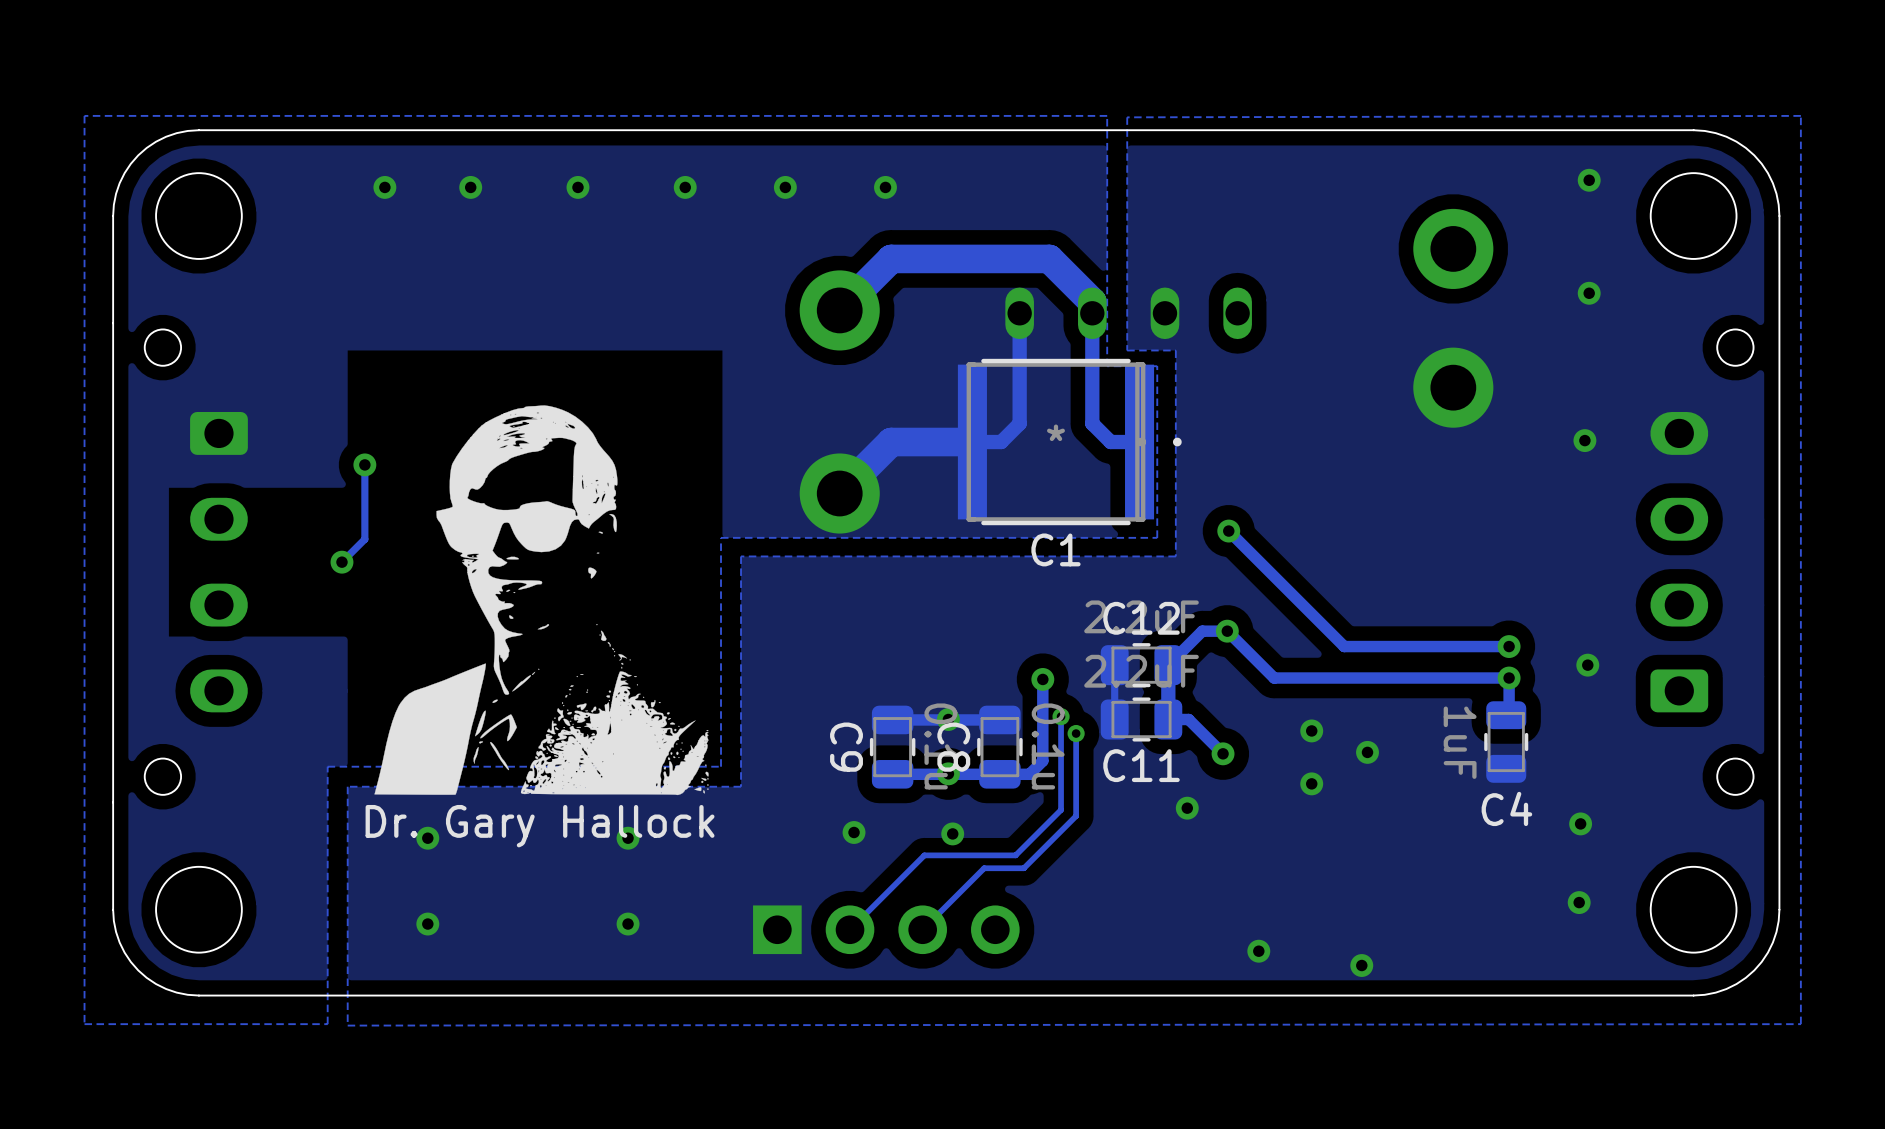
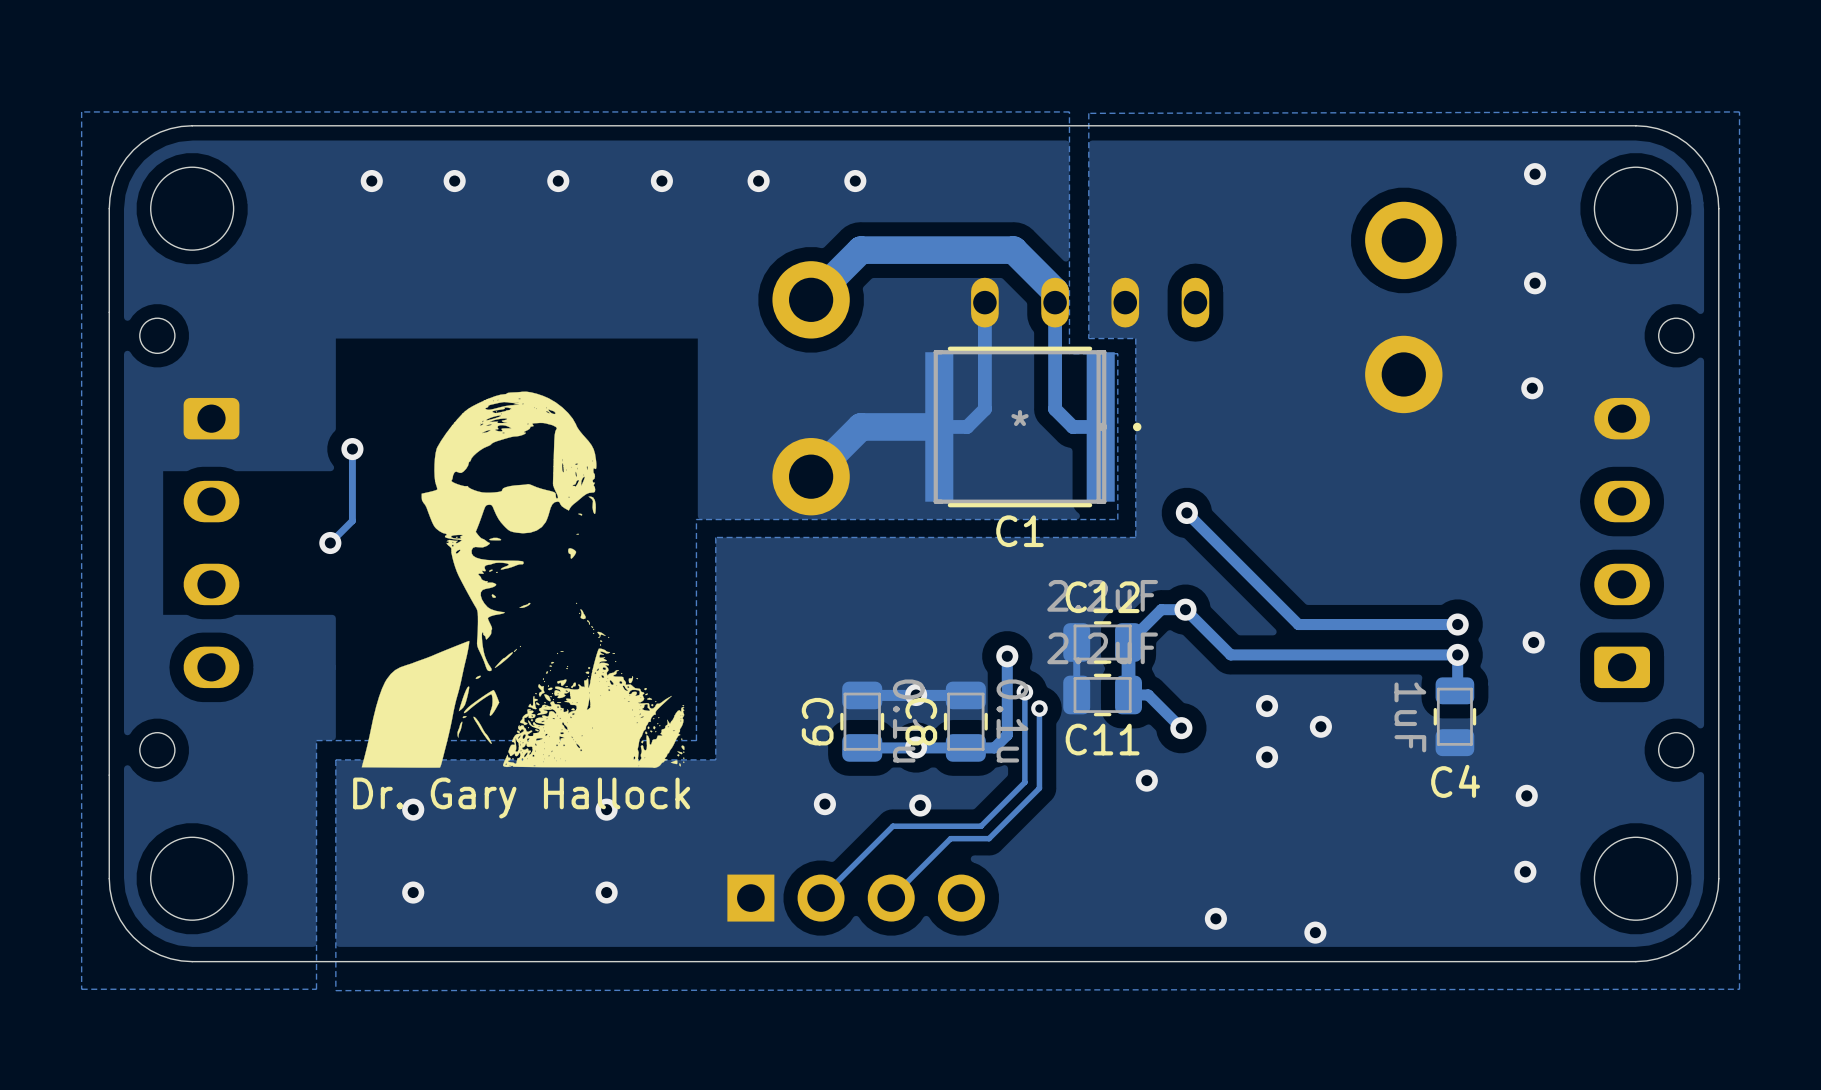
via position: (1584, 440) -> (1532, 388)

